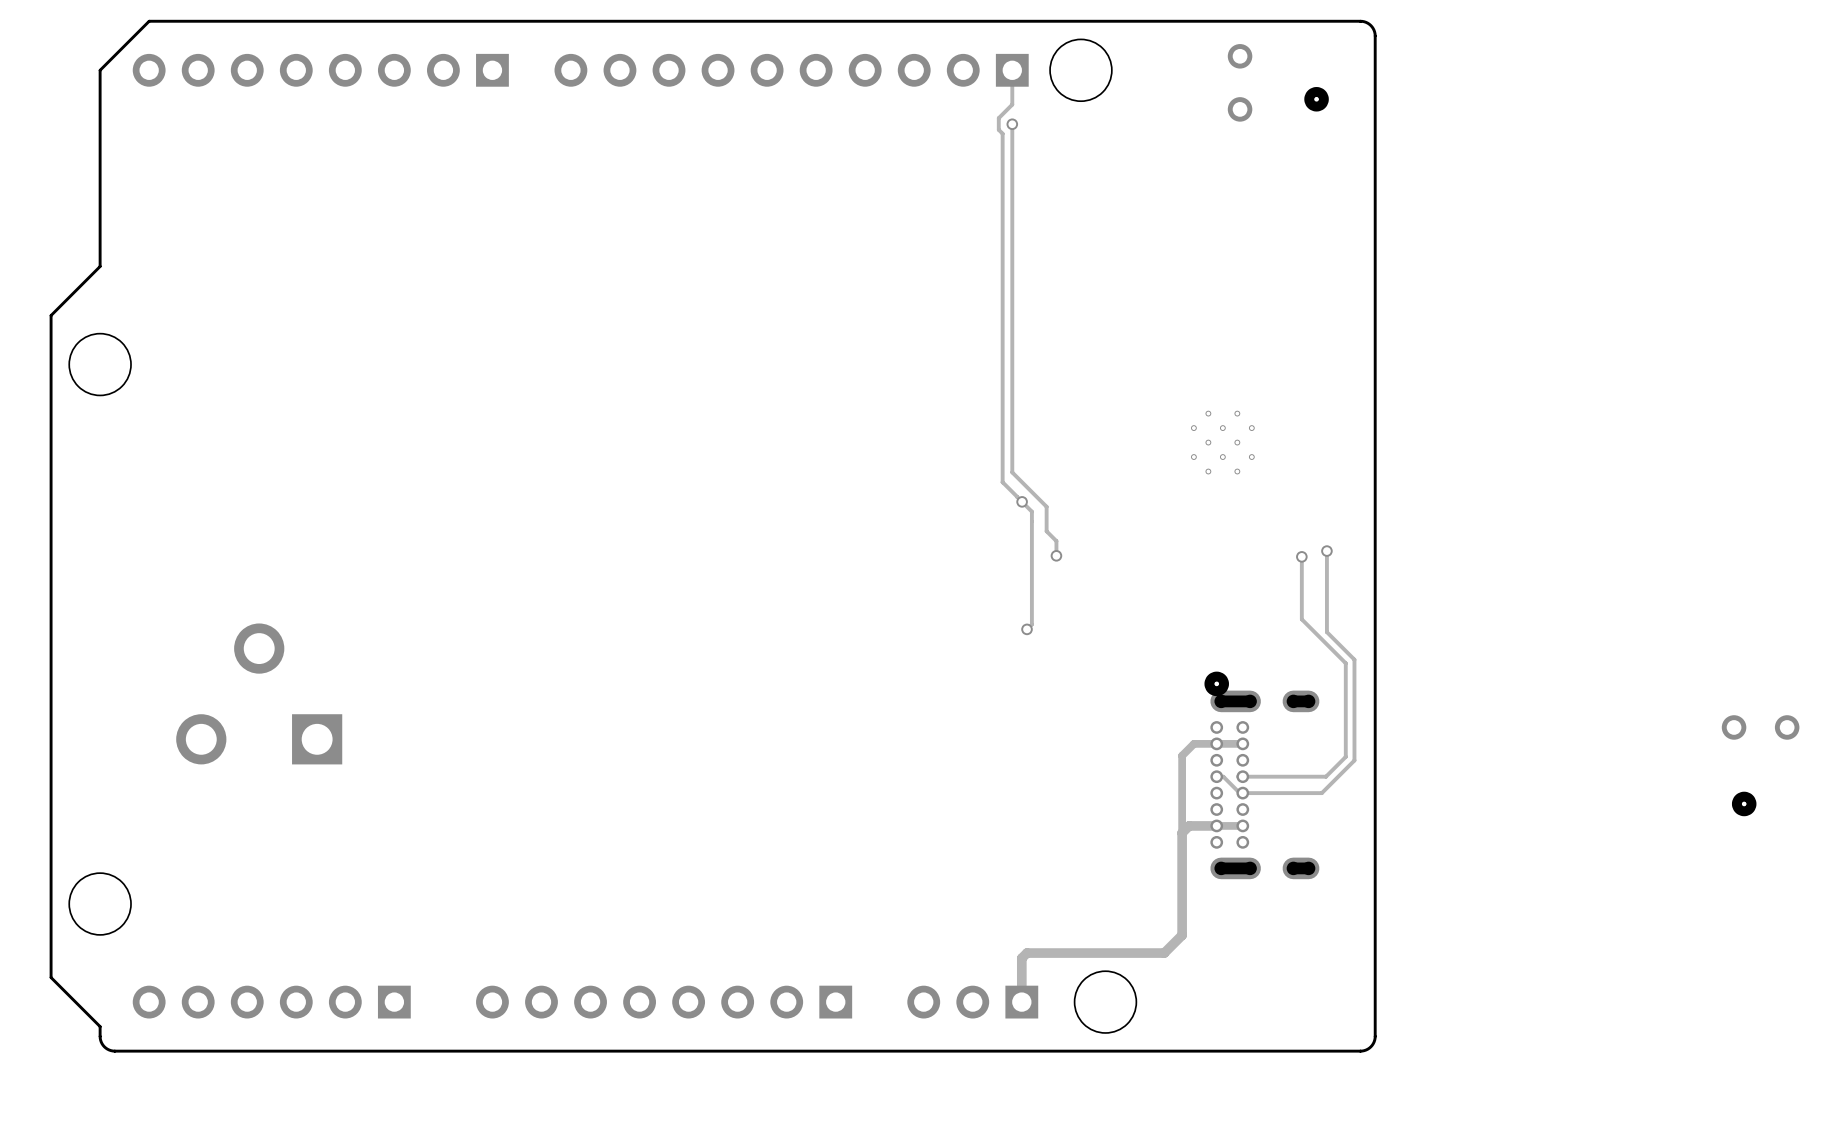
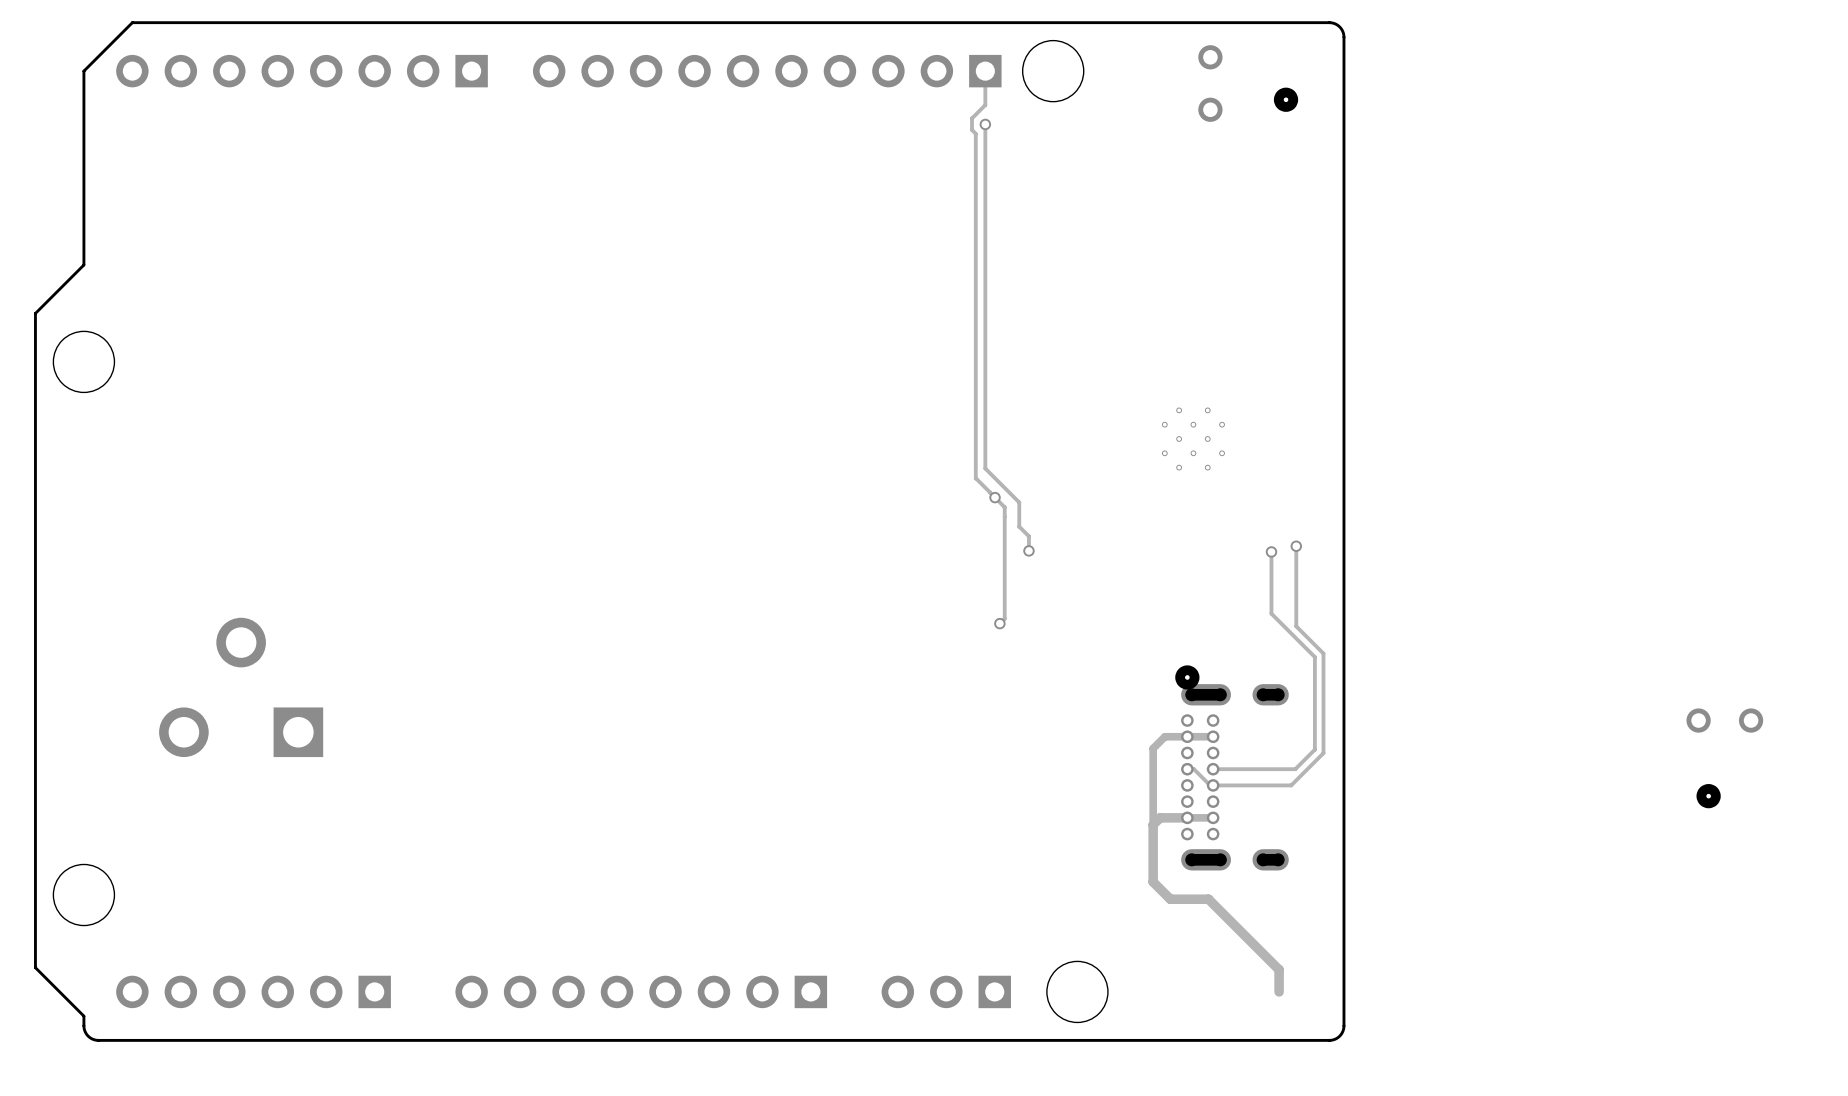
track: (1182, 890) (1182, 935) (1164, 953) (1027, 953) (1021, 958) (1021, 1002) -> (1153, 882) (1170, 899) (1208, 899) (1279, 969) (1279, 991)

